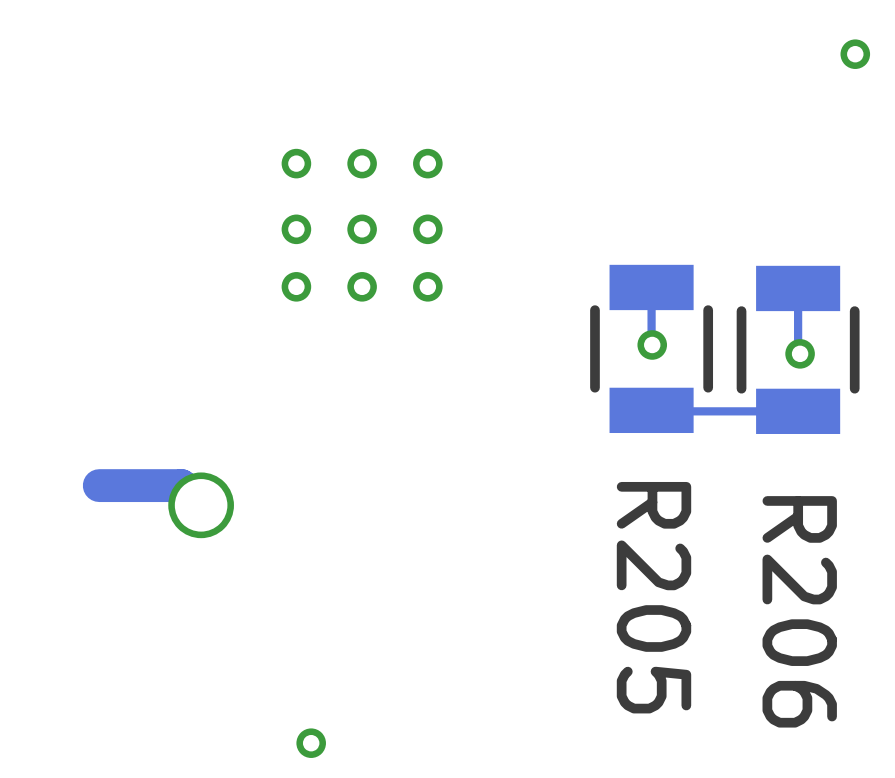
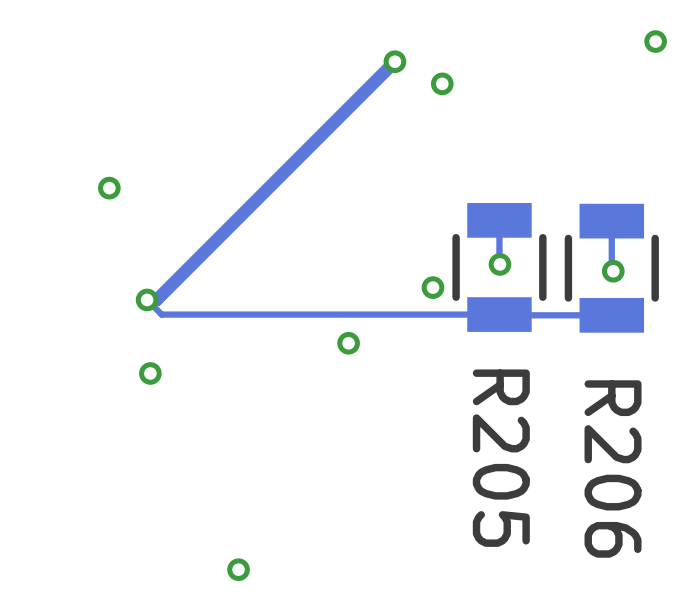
track: none -> (394, 61) (156, 299) (147, 299) (161, 314) (499, 314)
via: none -> (394, 61)
via: none -> (442, 83)
part: (296, 163) -> none
part: (362, 163) -> none
part: (427, 163) -> none
part: (296, 229) -> none
part: (362, 229) -> none
part: (427, 229) -> none
via: none -> (109, 188)
part: (296, 286) -> none
part: (362, 286) -> none
part: (427, 286) -> none
via: none -> (432, 287)
via: none -> (147, 299)
via: none -> (348, 343)
via size: [168, 472, 234, 539] -> [139, 362, 162, 385]
track: (99, 485) (181, 485) (201, 505) -> none

